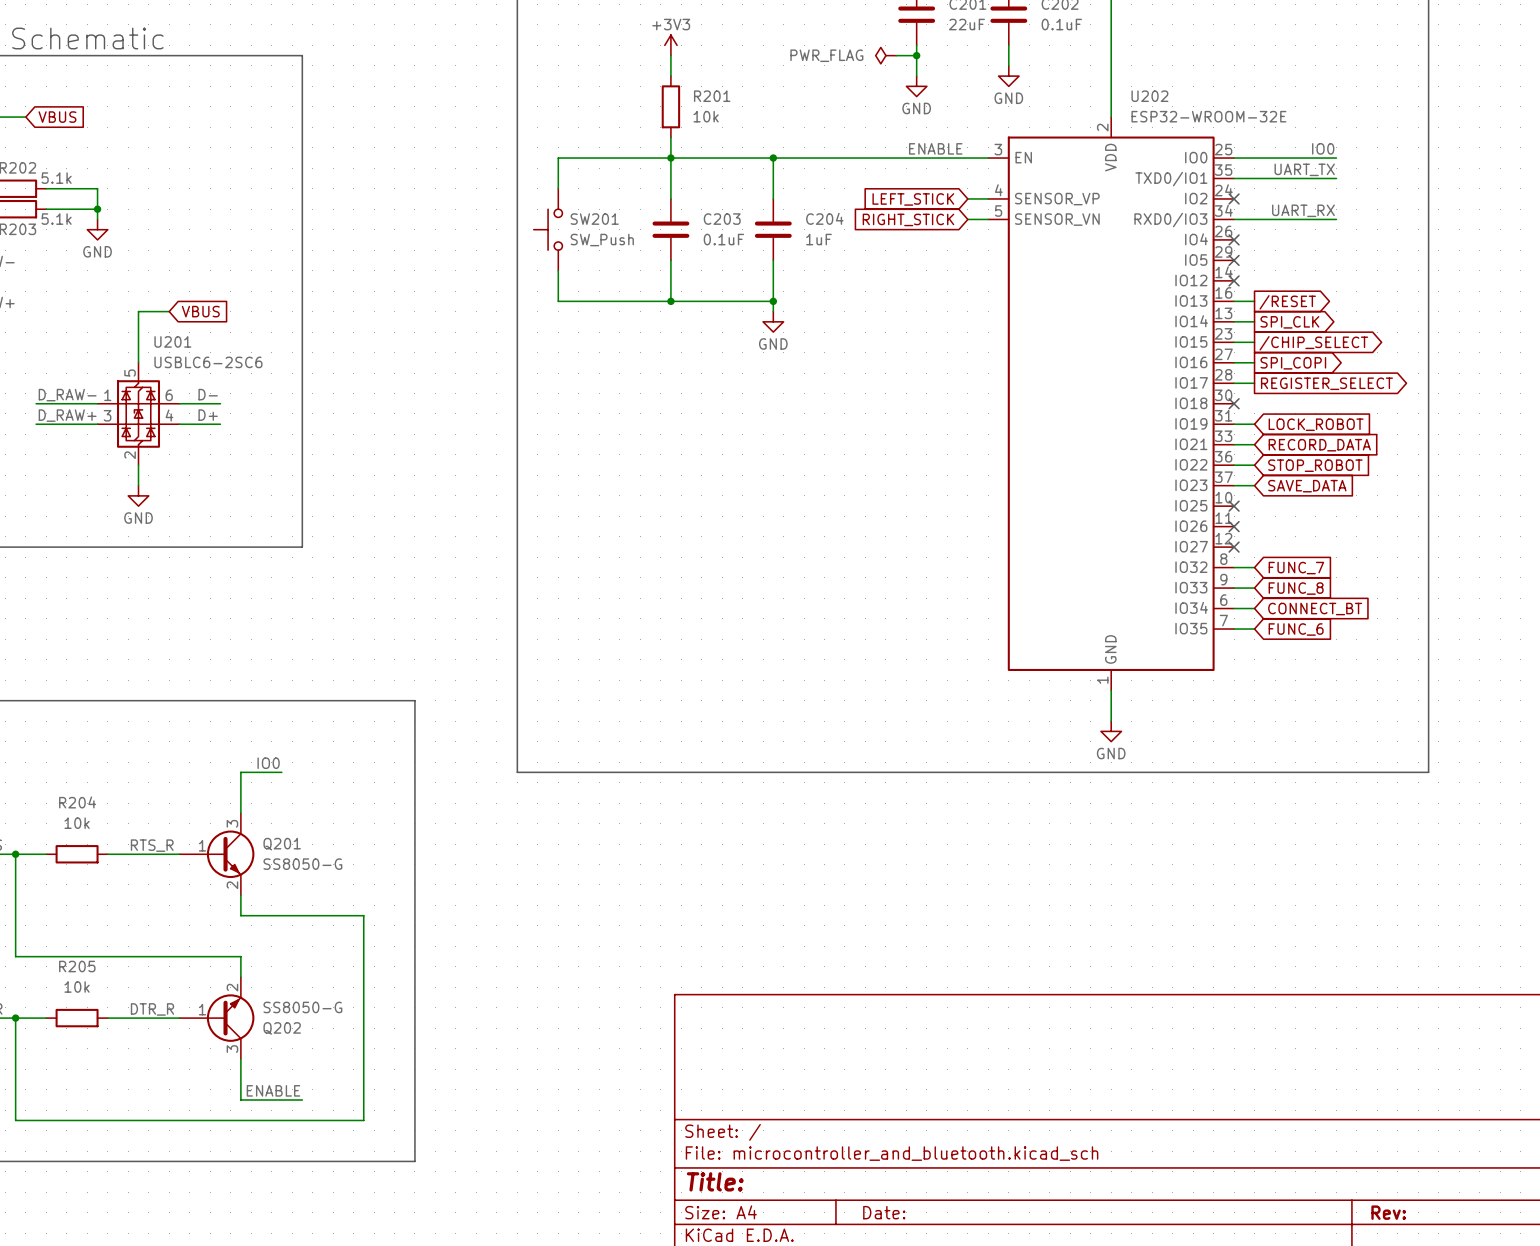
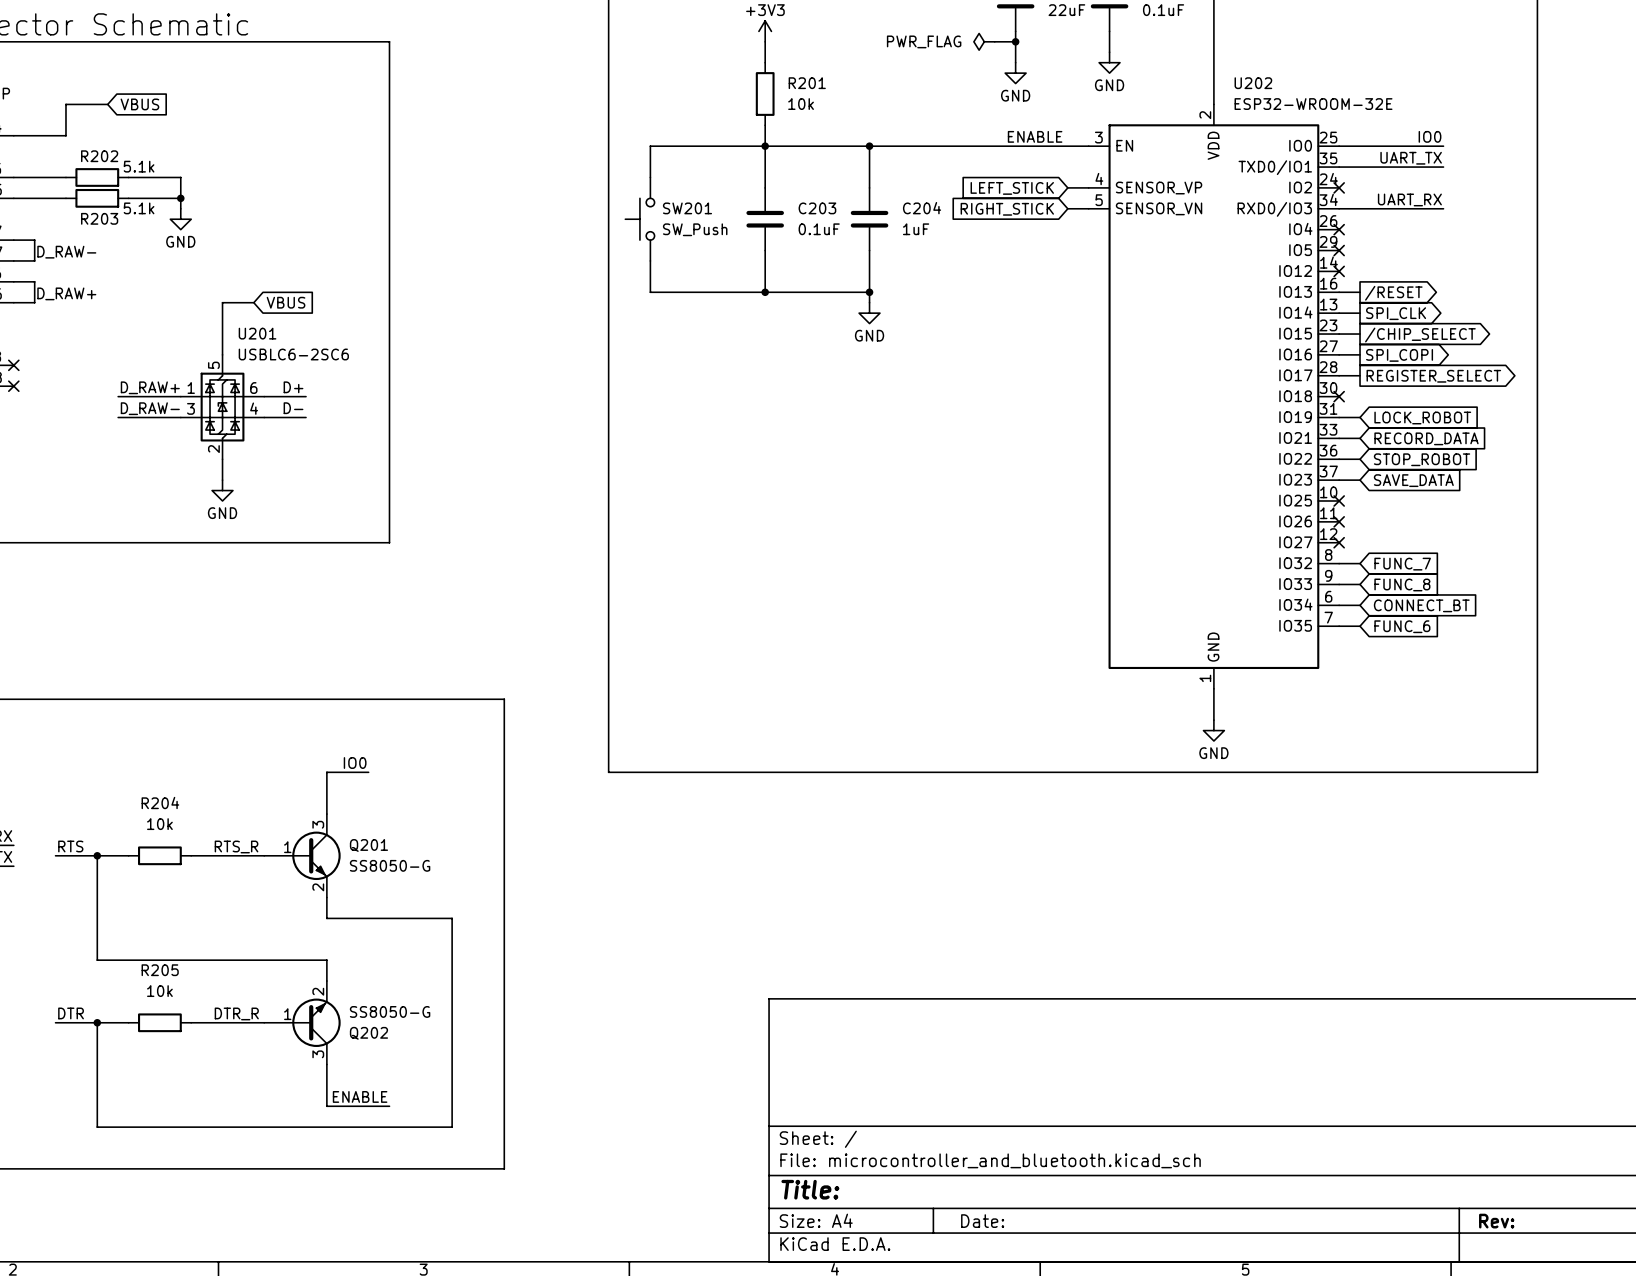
label: D- (208, 394) -> D+ (293, 387)
label: D_RAW- (67, 395) -> D_RAW+ (150, 387)
label: D_RAW+ (67, 415) -> D_RAW- (150, 408)
label: D+ (208, 415) -> D- (293, 408)

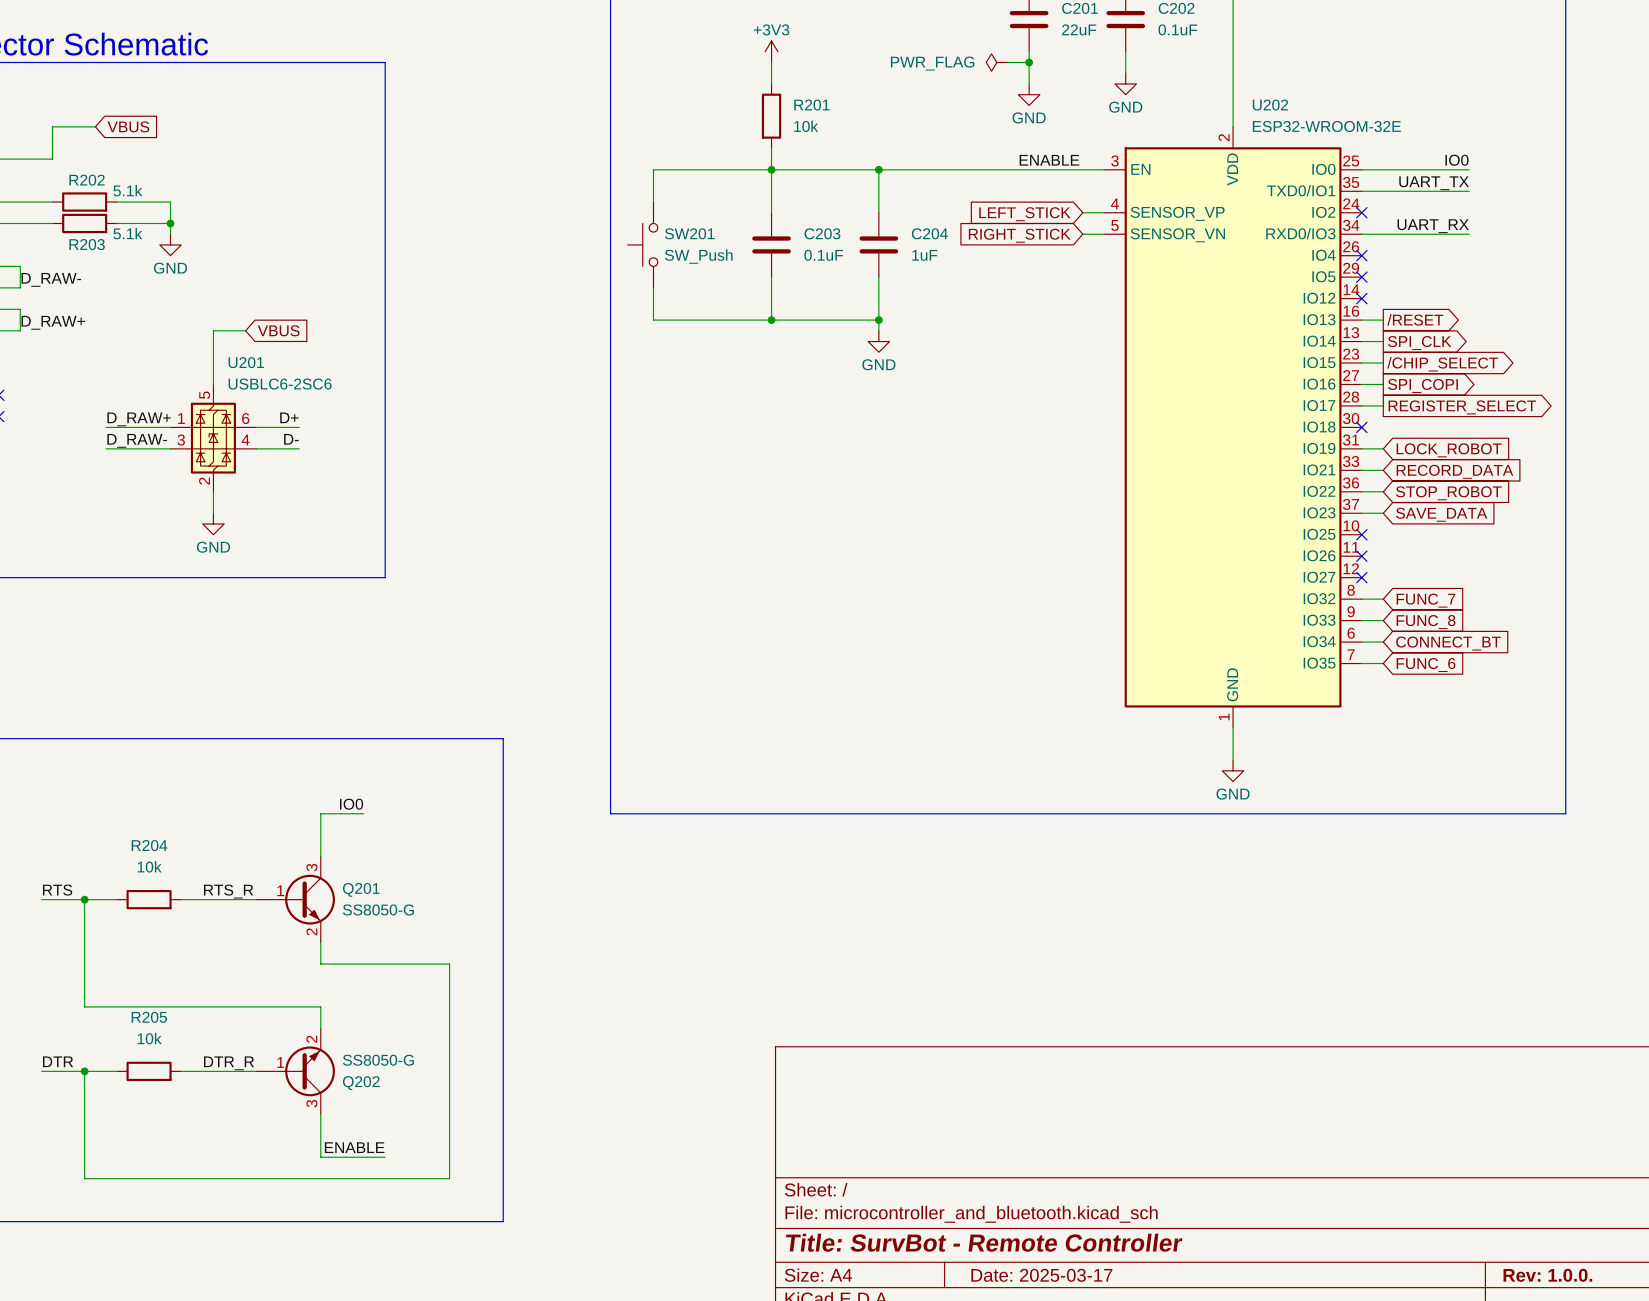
title block: Title: (810, 1189) -> Title: SurvBot - Remote Controller (984, 1242)
title block: Date: (982, 1221) -> Date: 2025-03-17 (1041, 1275)
title block: Rev: (1496, 1221) -> Rev: 1.0.0. (1547, 1275)

